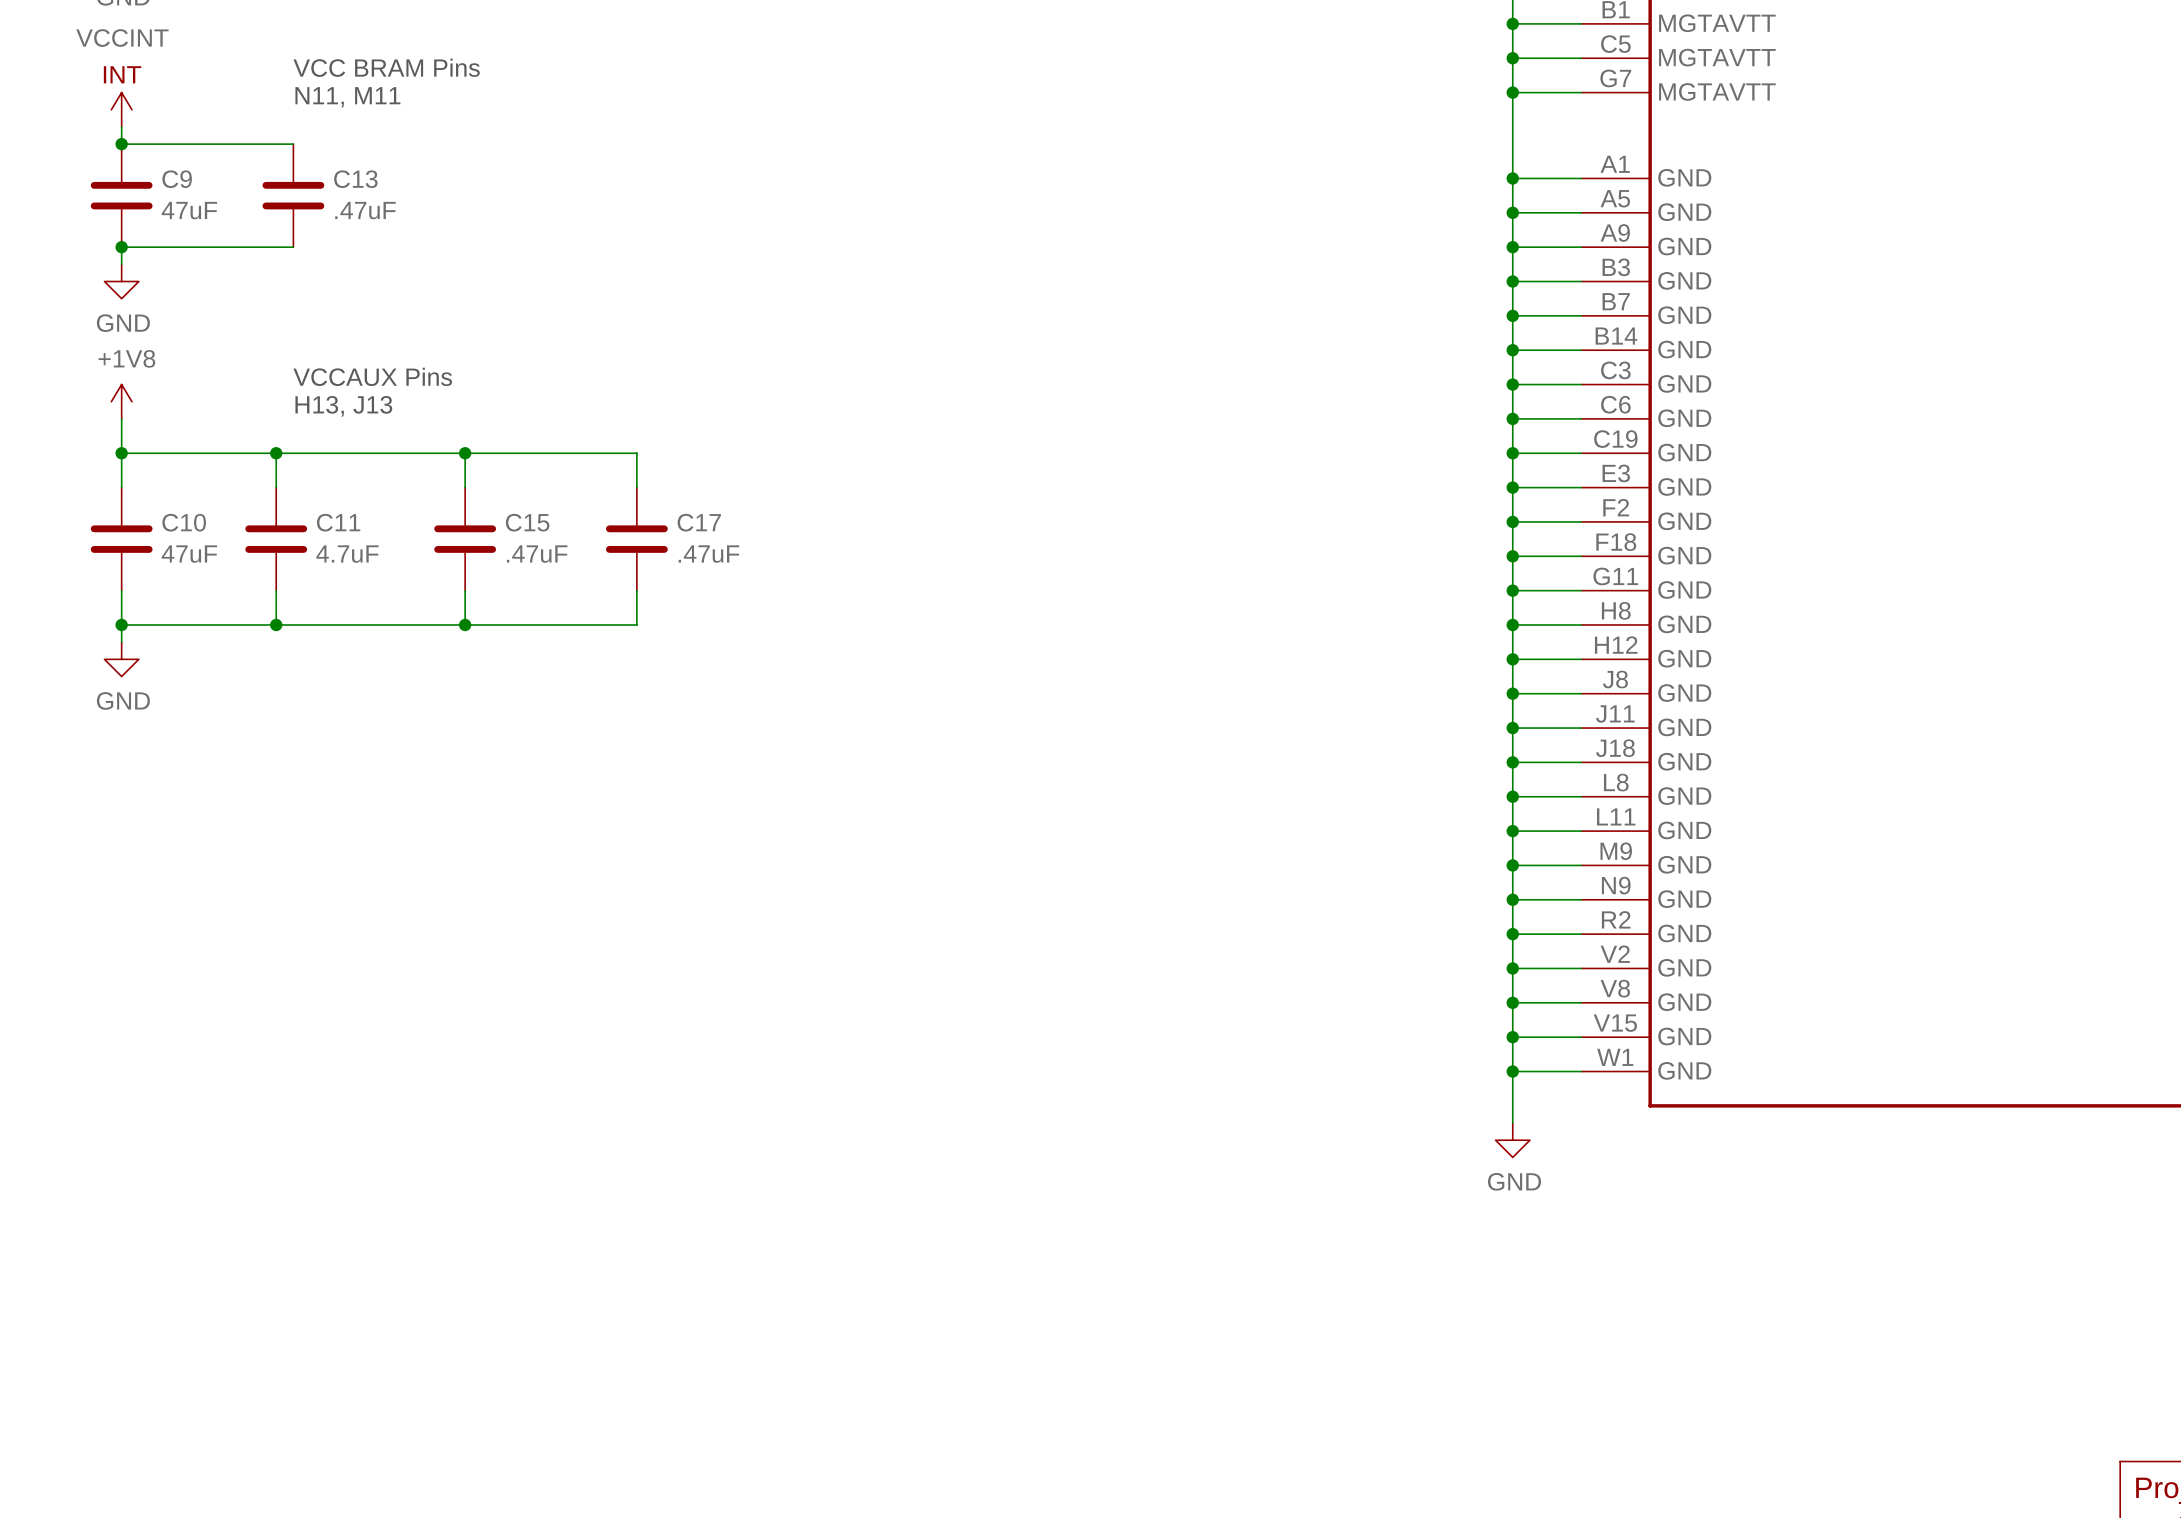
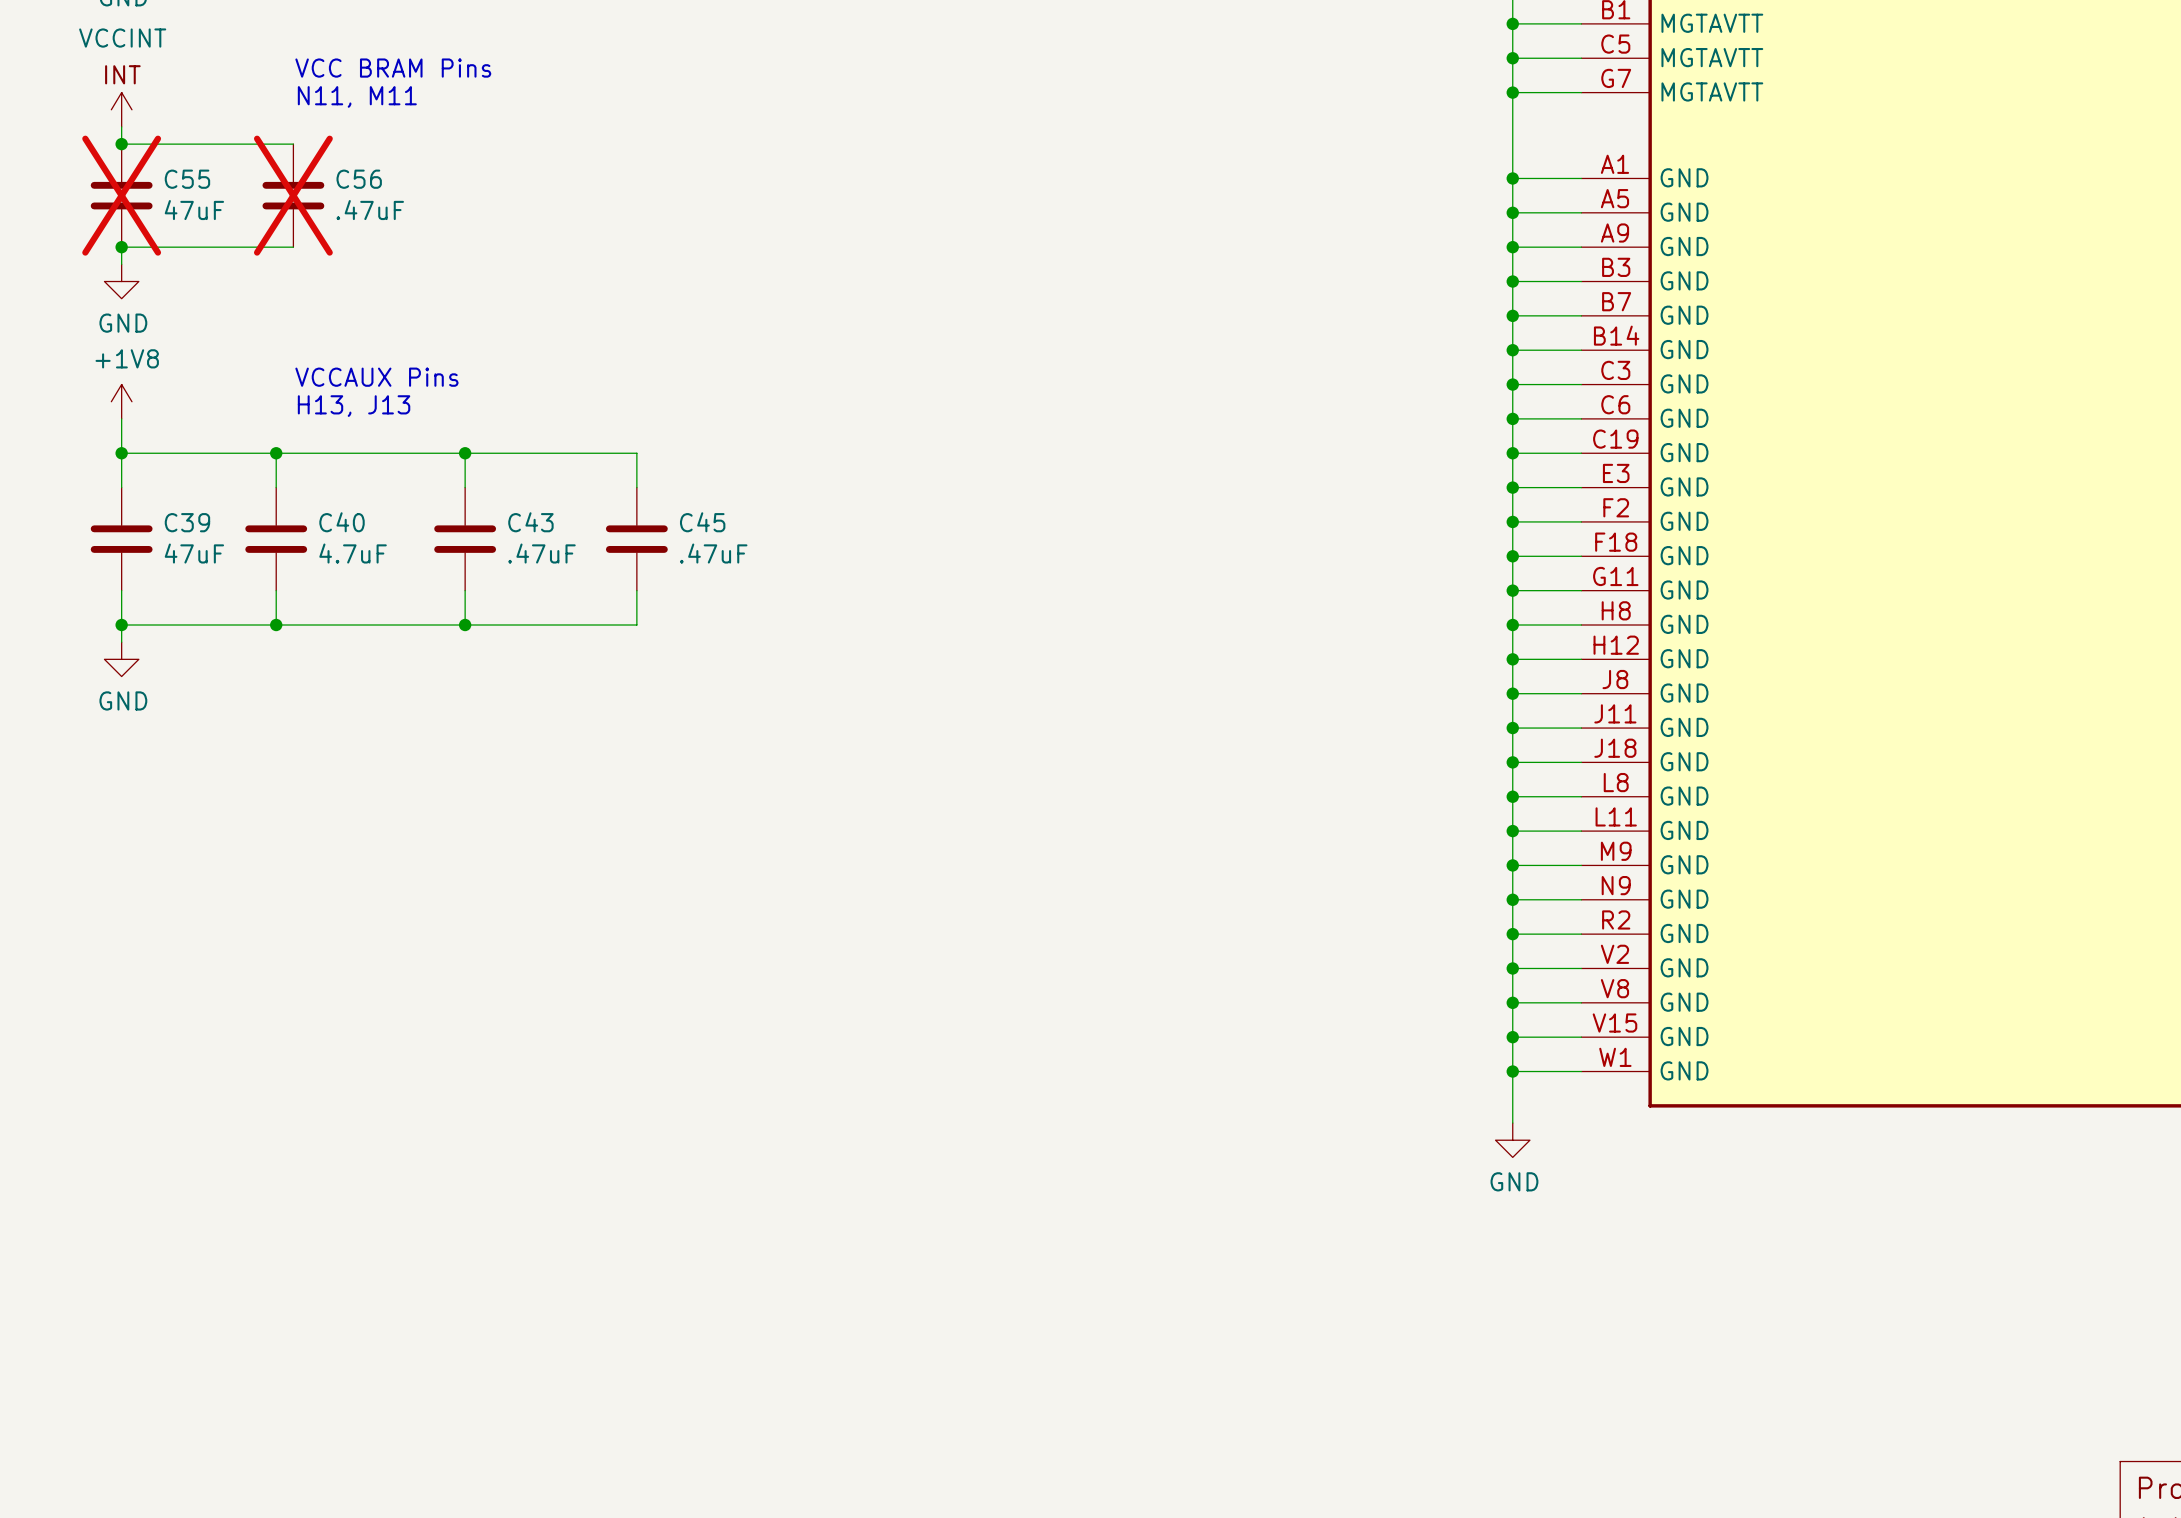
C9 name: C9 (177, 179) -> C55 (187, 179)
C13 name: C13 (355, 179) -> C56 (359, 179)
C9 do-not-place cross: none -> (121, 195)
C13 do-not-place cross: none -> (293, 195)
C10 name: C10 (184, 522) -> C39 (187, 522)
C11 name: C11 (338, 522) -> C40 (342, 522)
C15 name: C15 (527, 522) -> C43 (530, 522)
C17 name: C17 (699, 522) -> C45 (702, 522)

